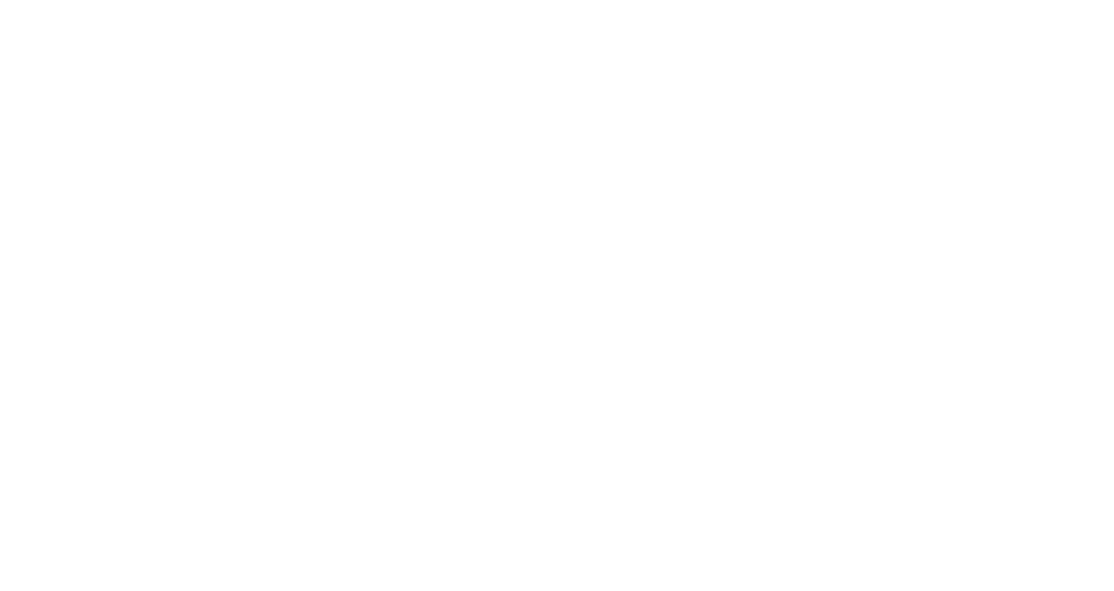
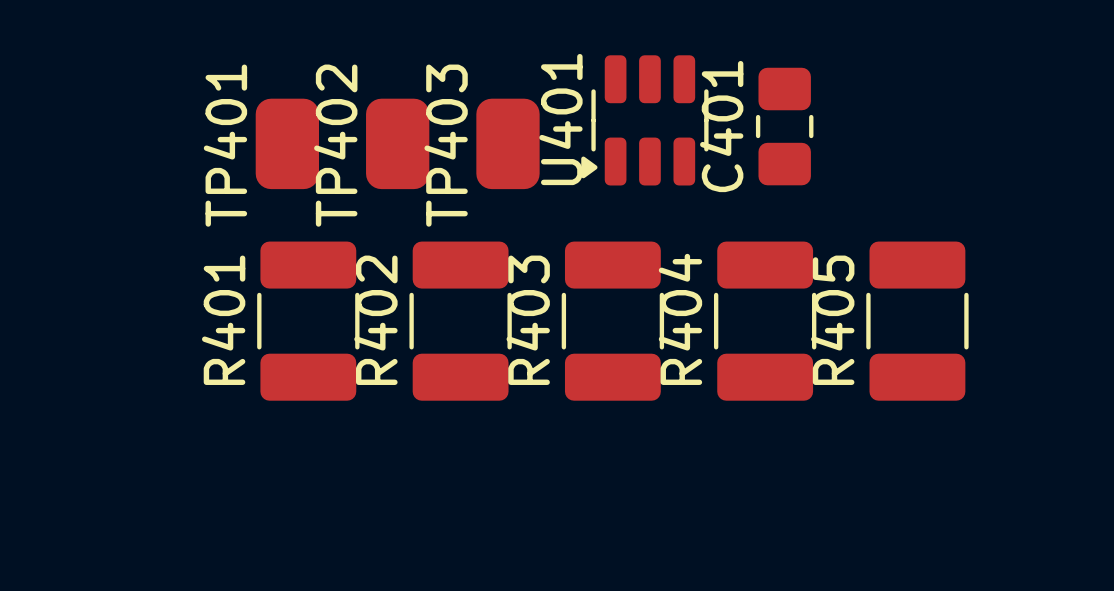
U401: none -> (644, 120)
C401: none -> (784, 126)
TP401: none -> (287, 143)
TP402: none -> (397, 143)
TP403: none -> (507, 143)
R401: none -> (308, 321)
R402: none -> (460, 321)
R403: none -> (612, 321)
R404: none -> (765, 321)
R405: none -> (917, 321)

